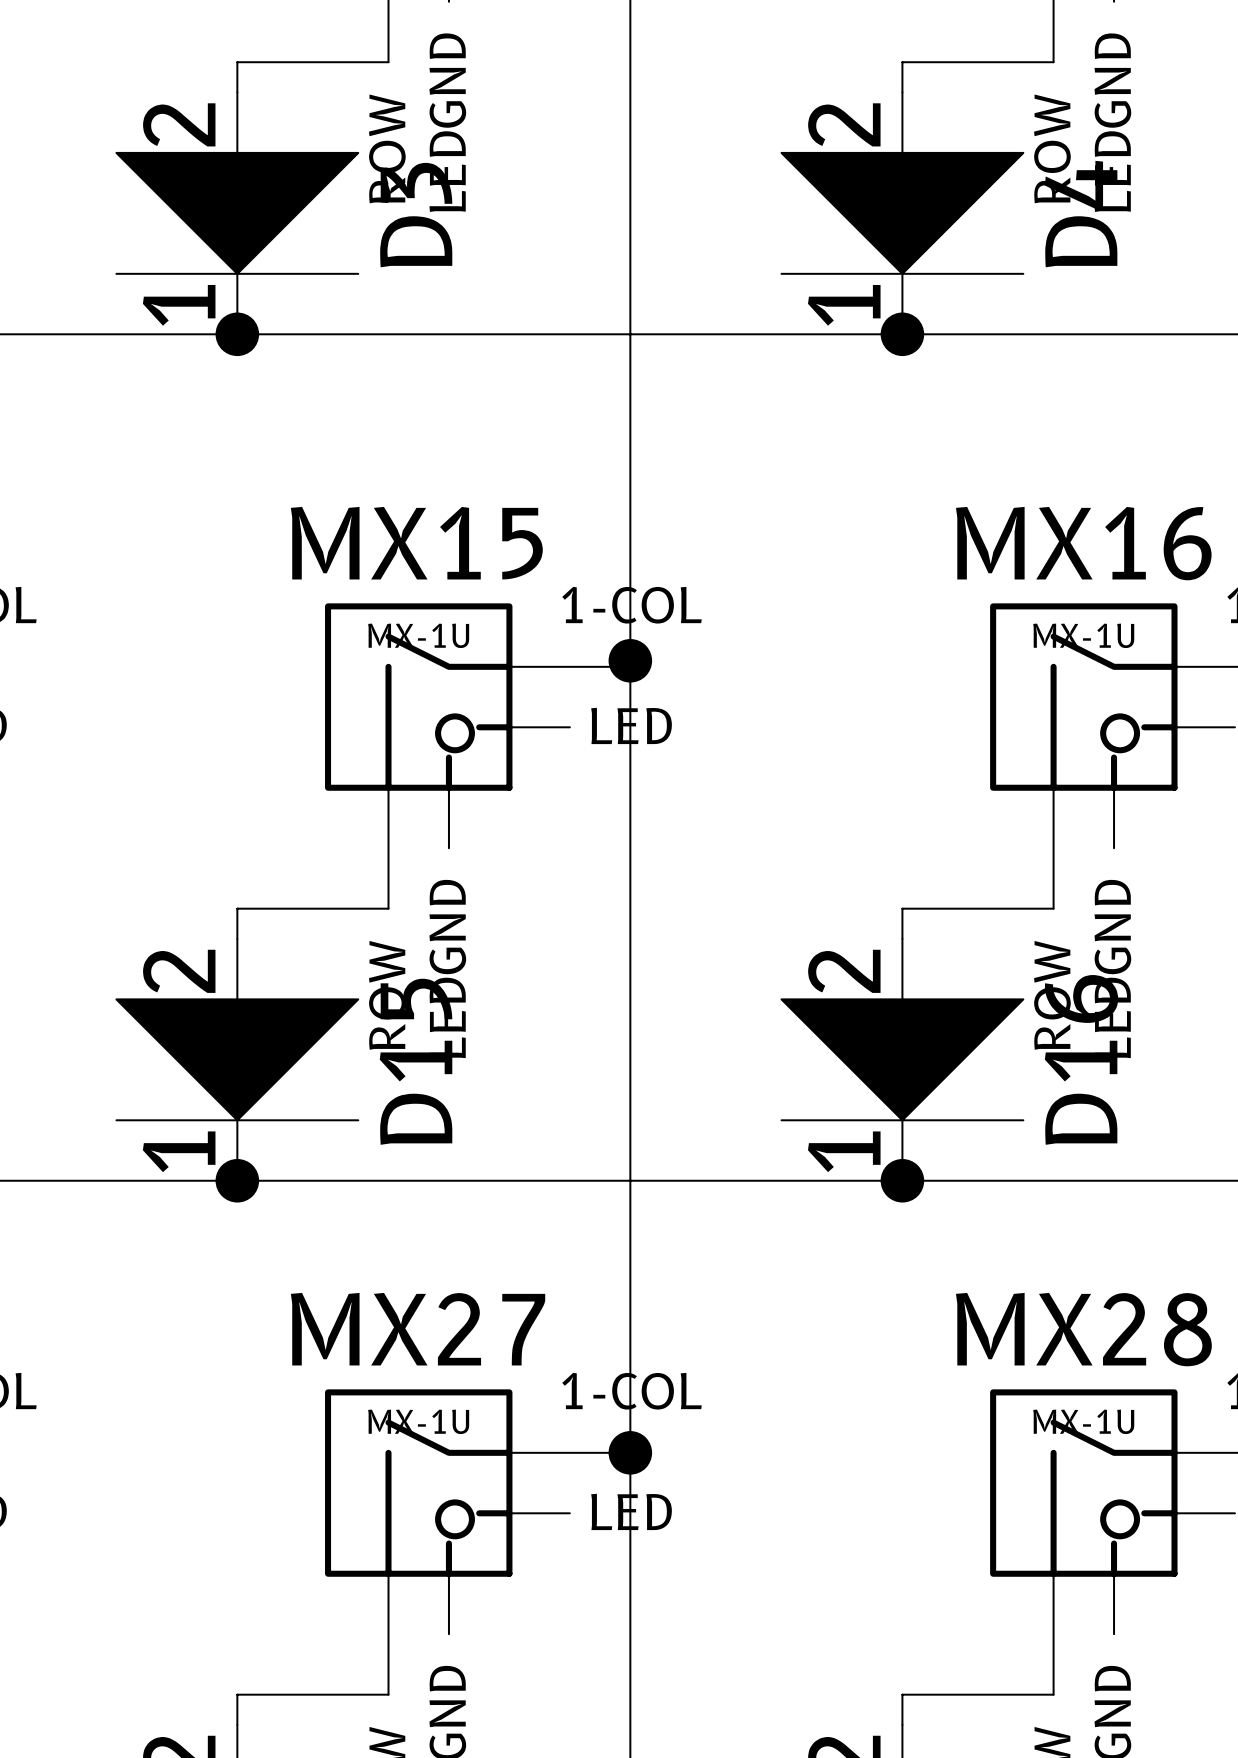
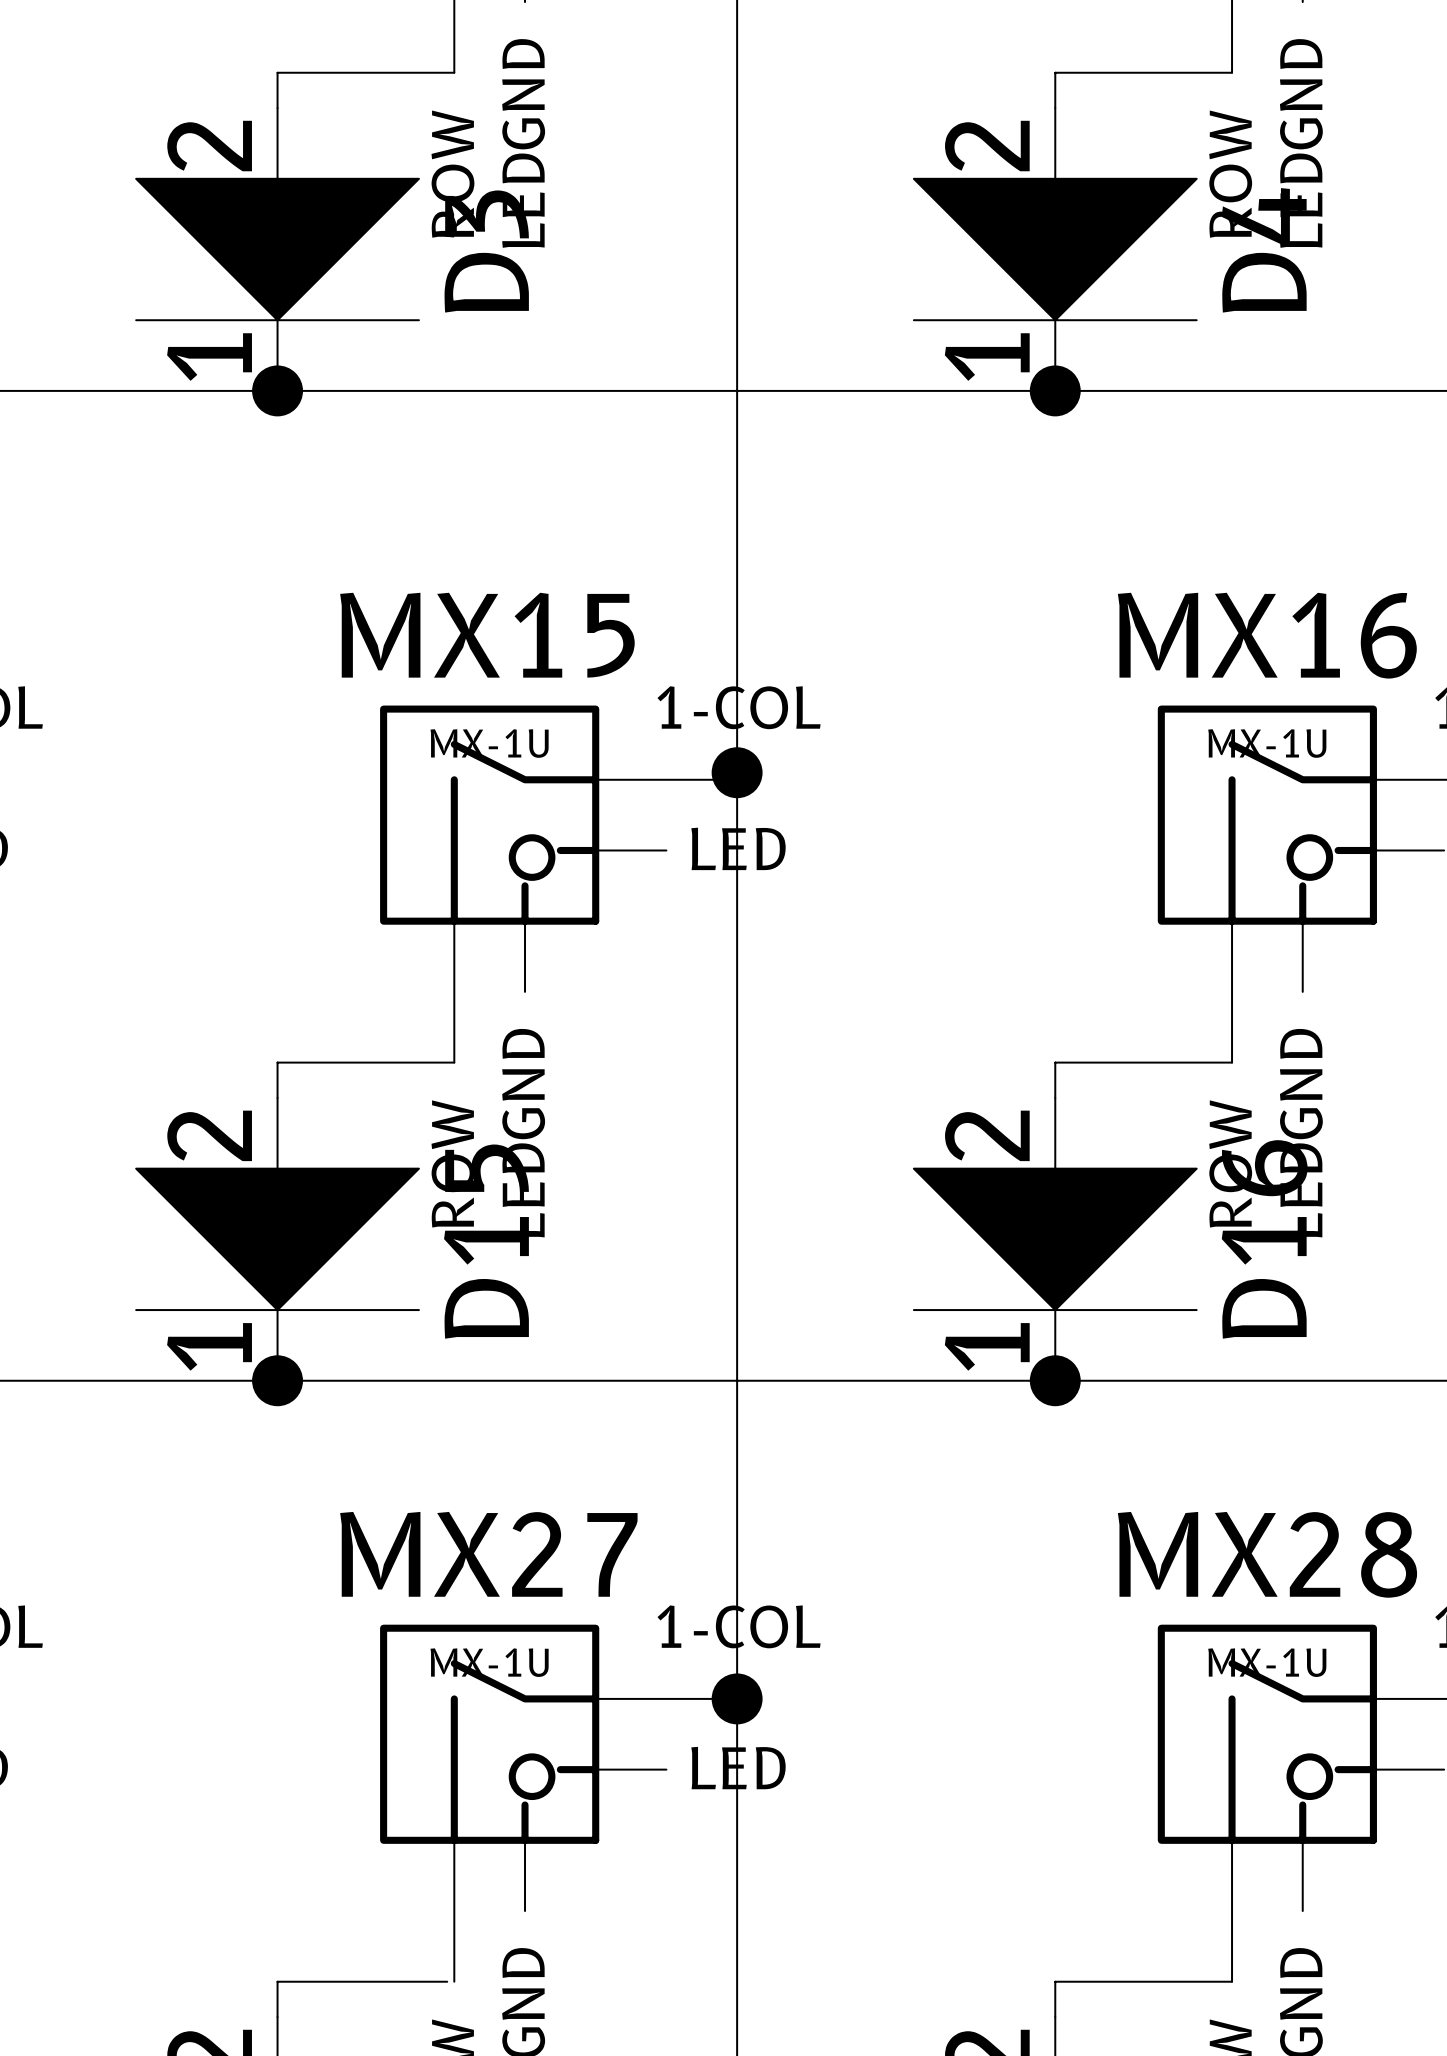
wire: (382, 1694) (388, 1694) -> none

